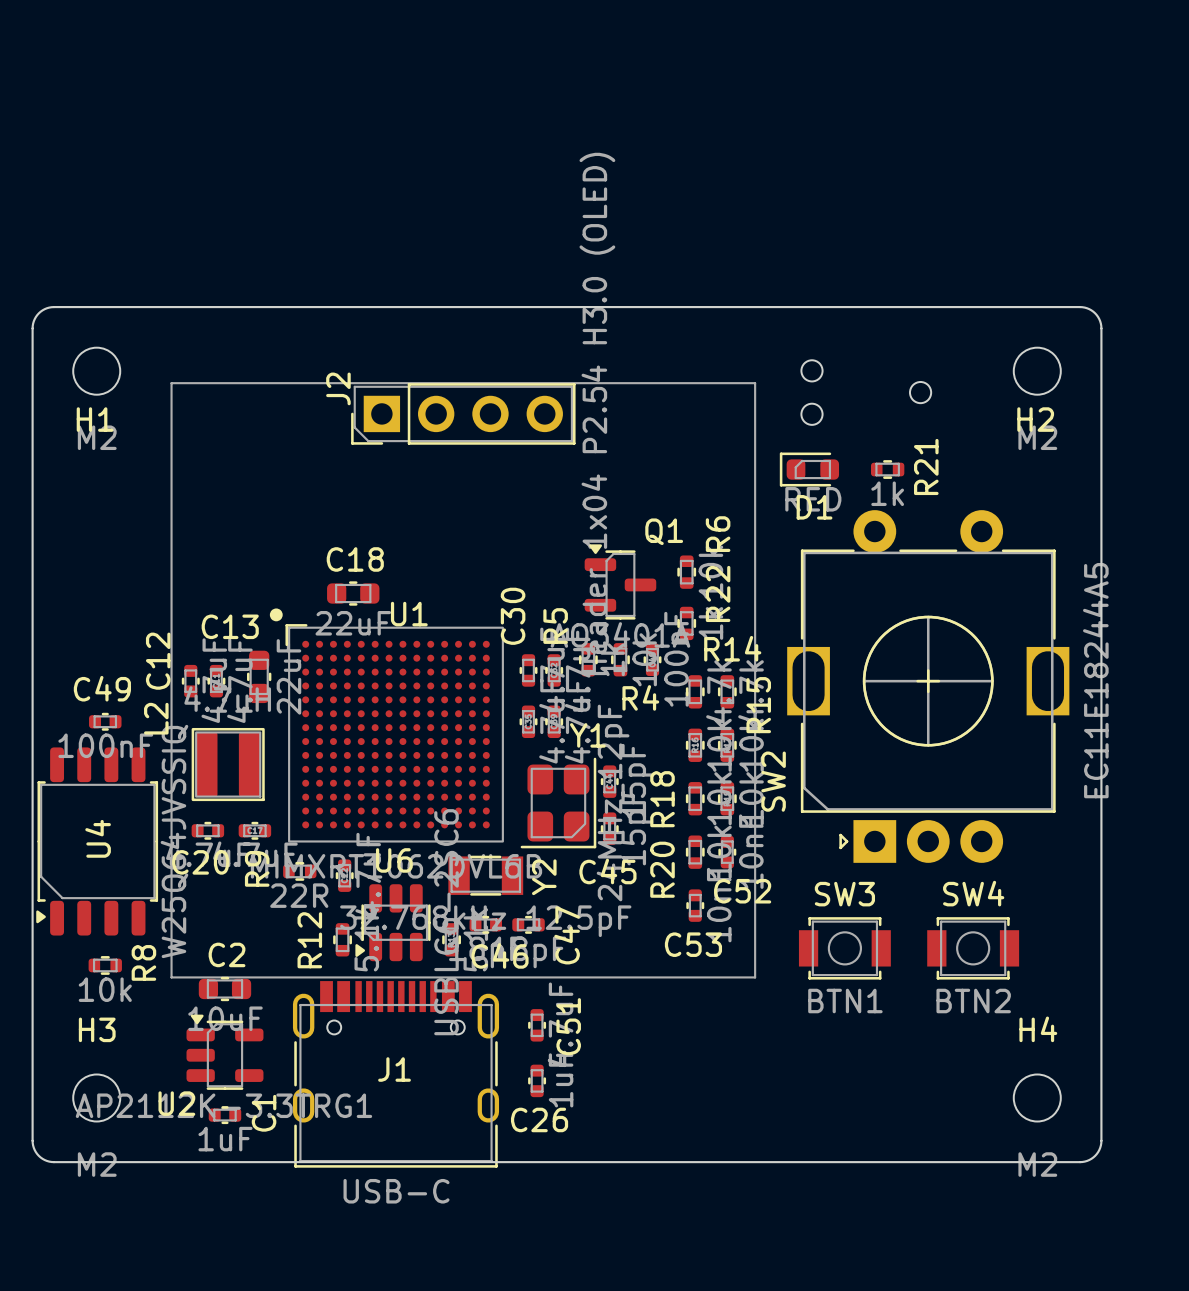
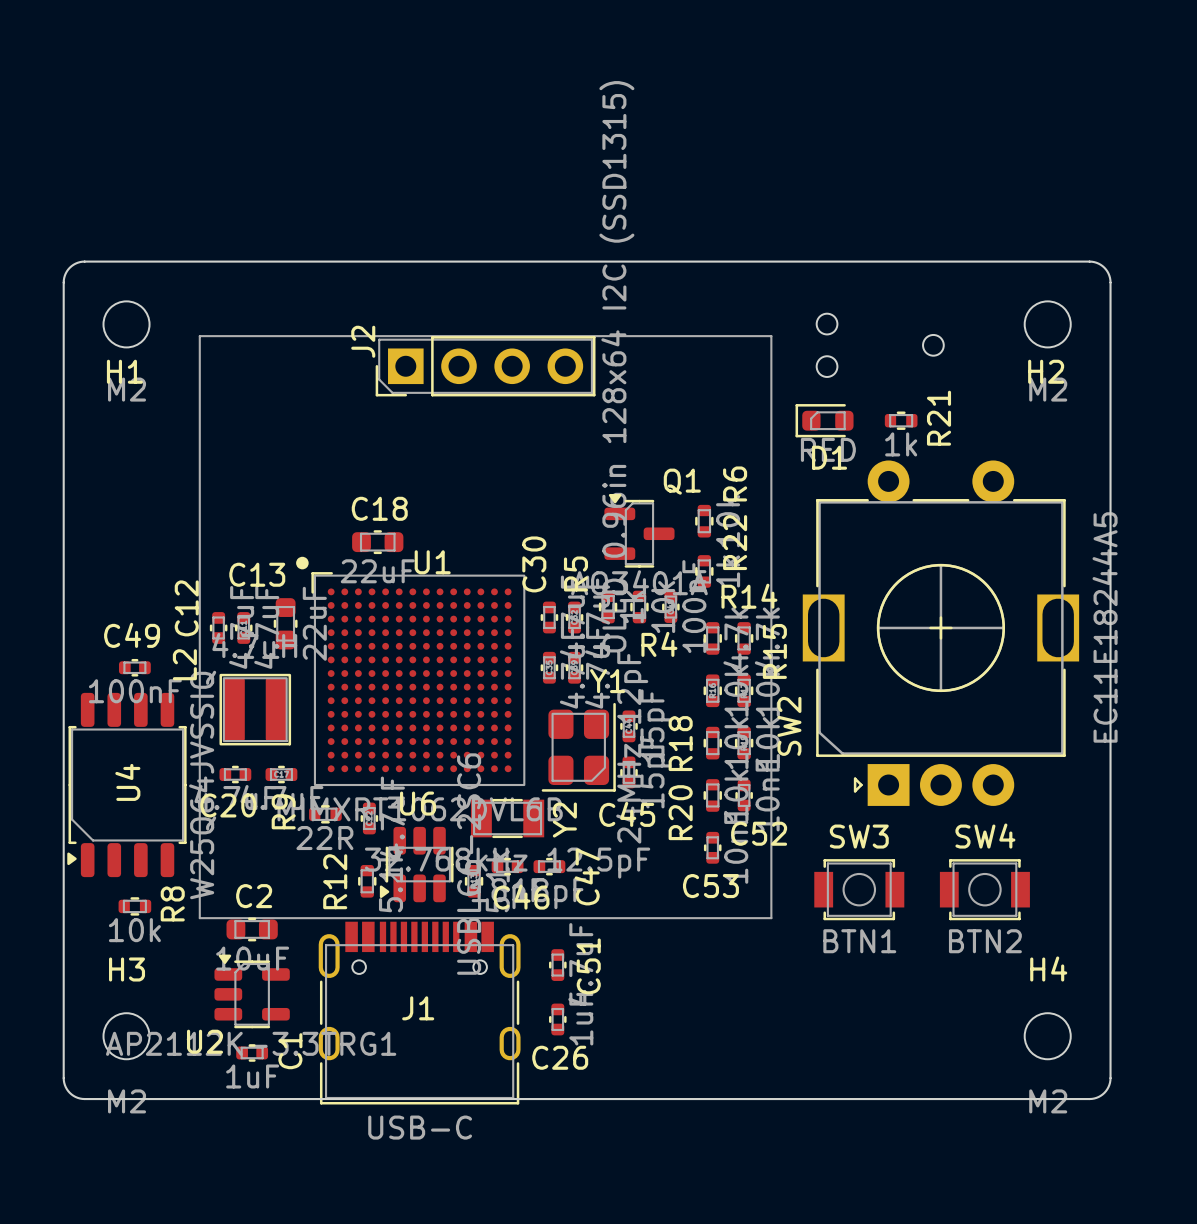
J2 value: Header 1x04 P2.54 H3.0 (OLED) (597, 413) -> OLED 0.96in 128x64 I2C (SSD1315) (616, 366)

